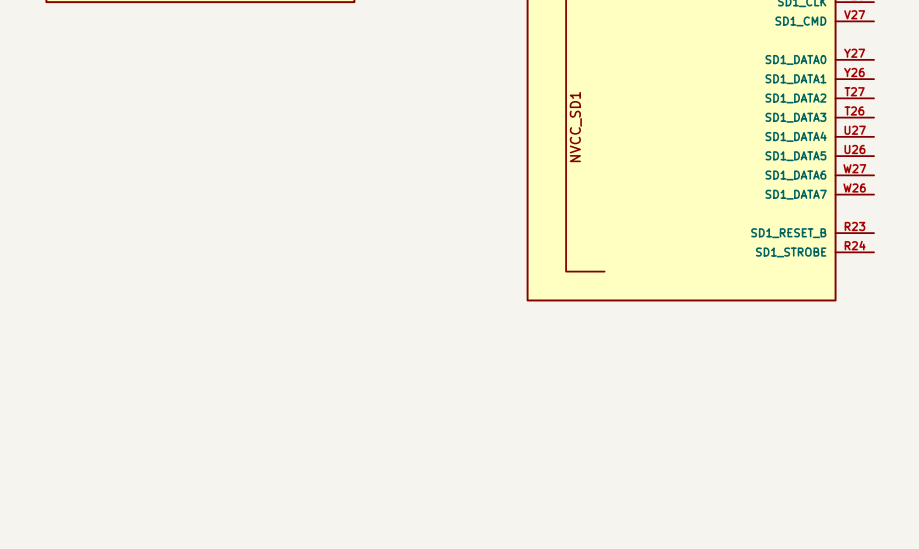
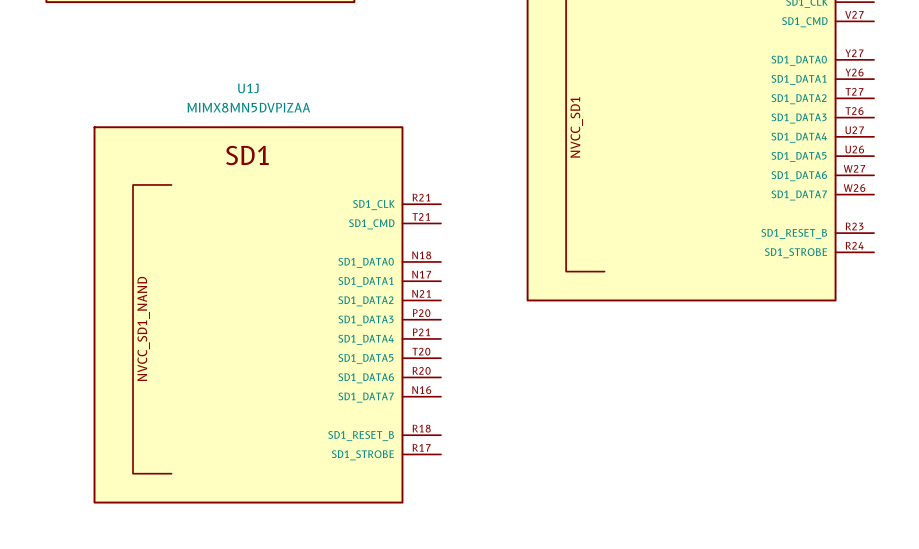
U1J: none -> MIMX8MN5DVPIZAA (267, 314)

